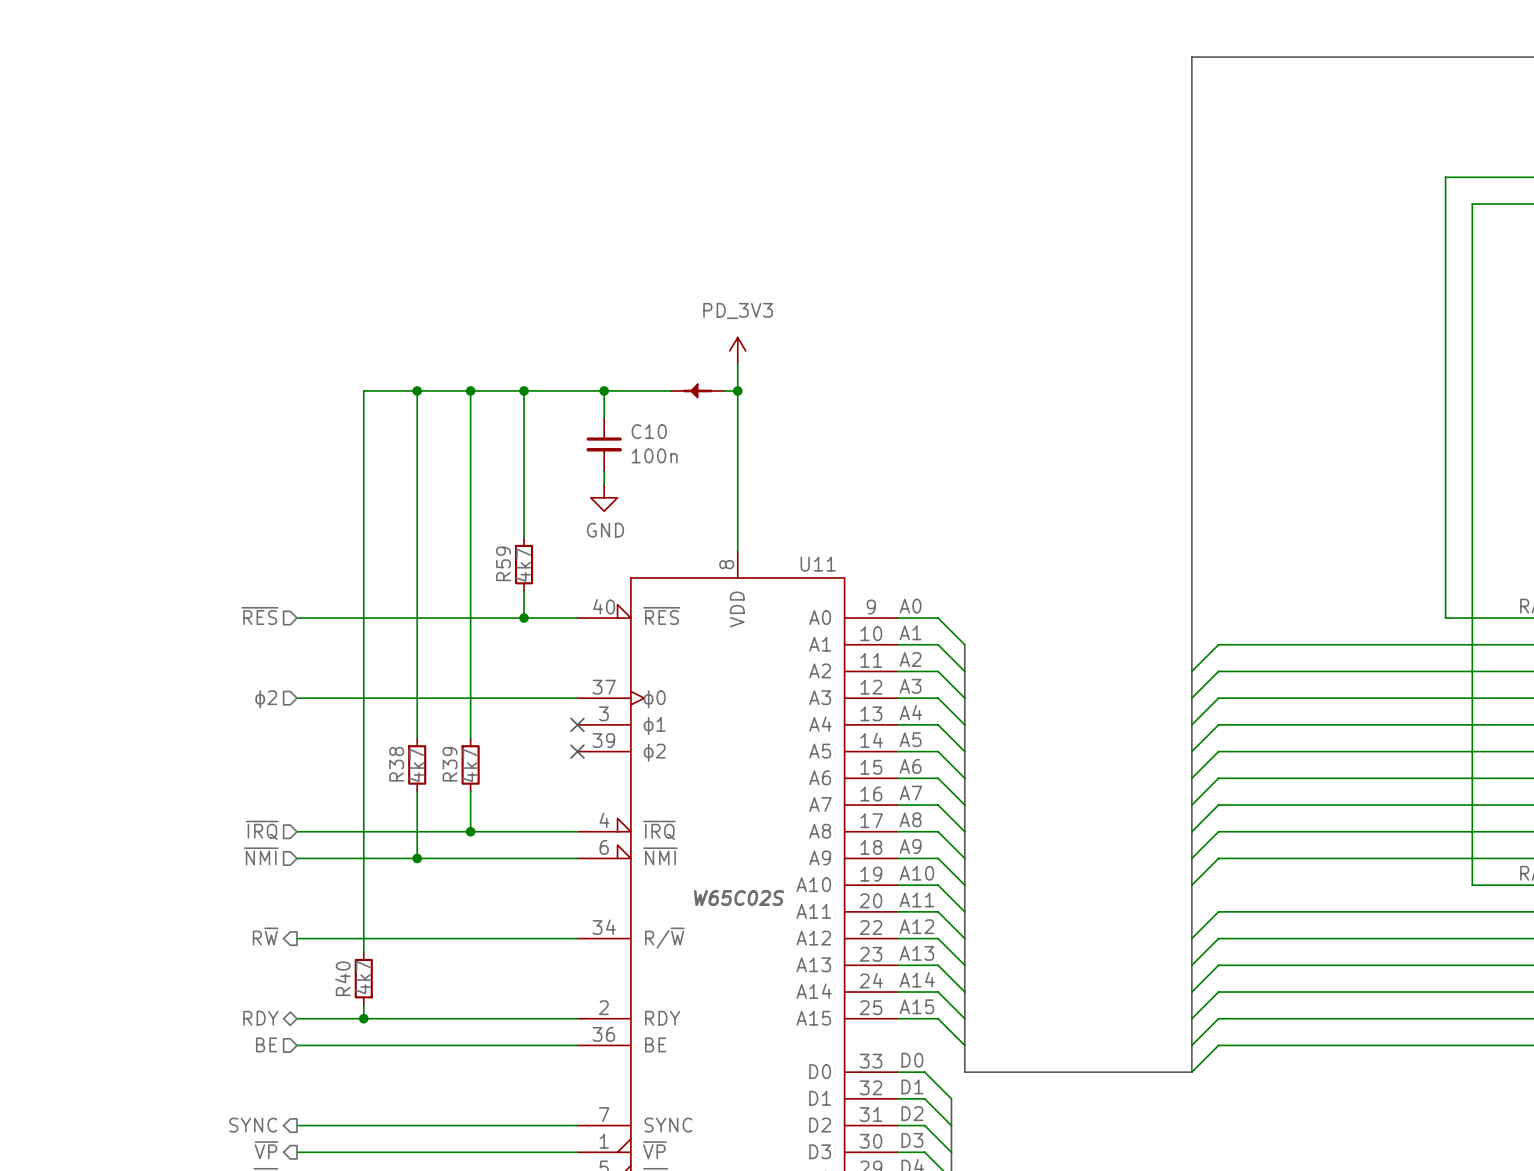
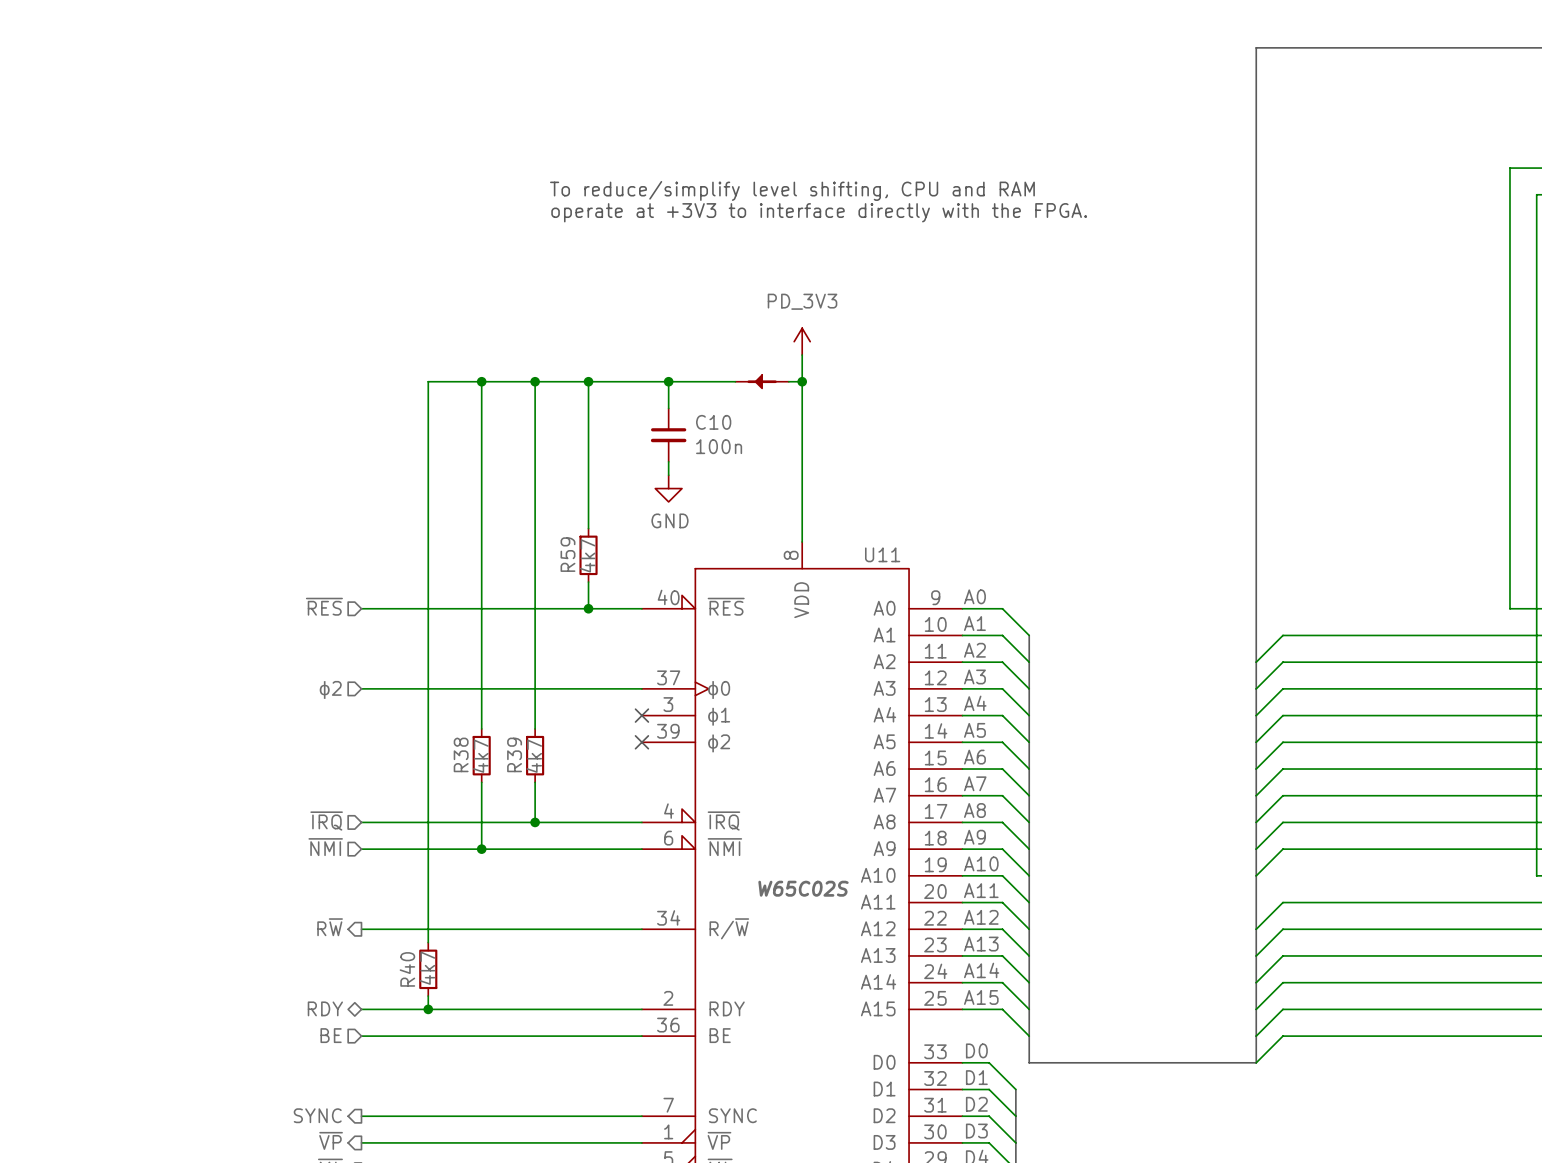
text: none -> To reduce/simplify level shifting, CPU and RAM (792, 190)
text: none -> operate at +3V3 to interface directly with the FPGA. (819, 212)

